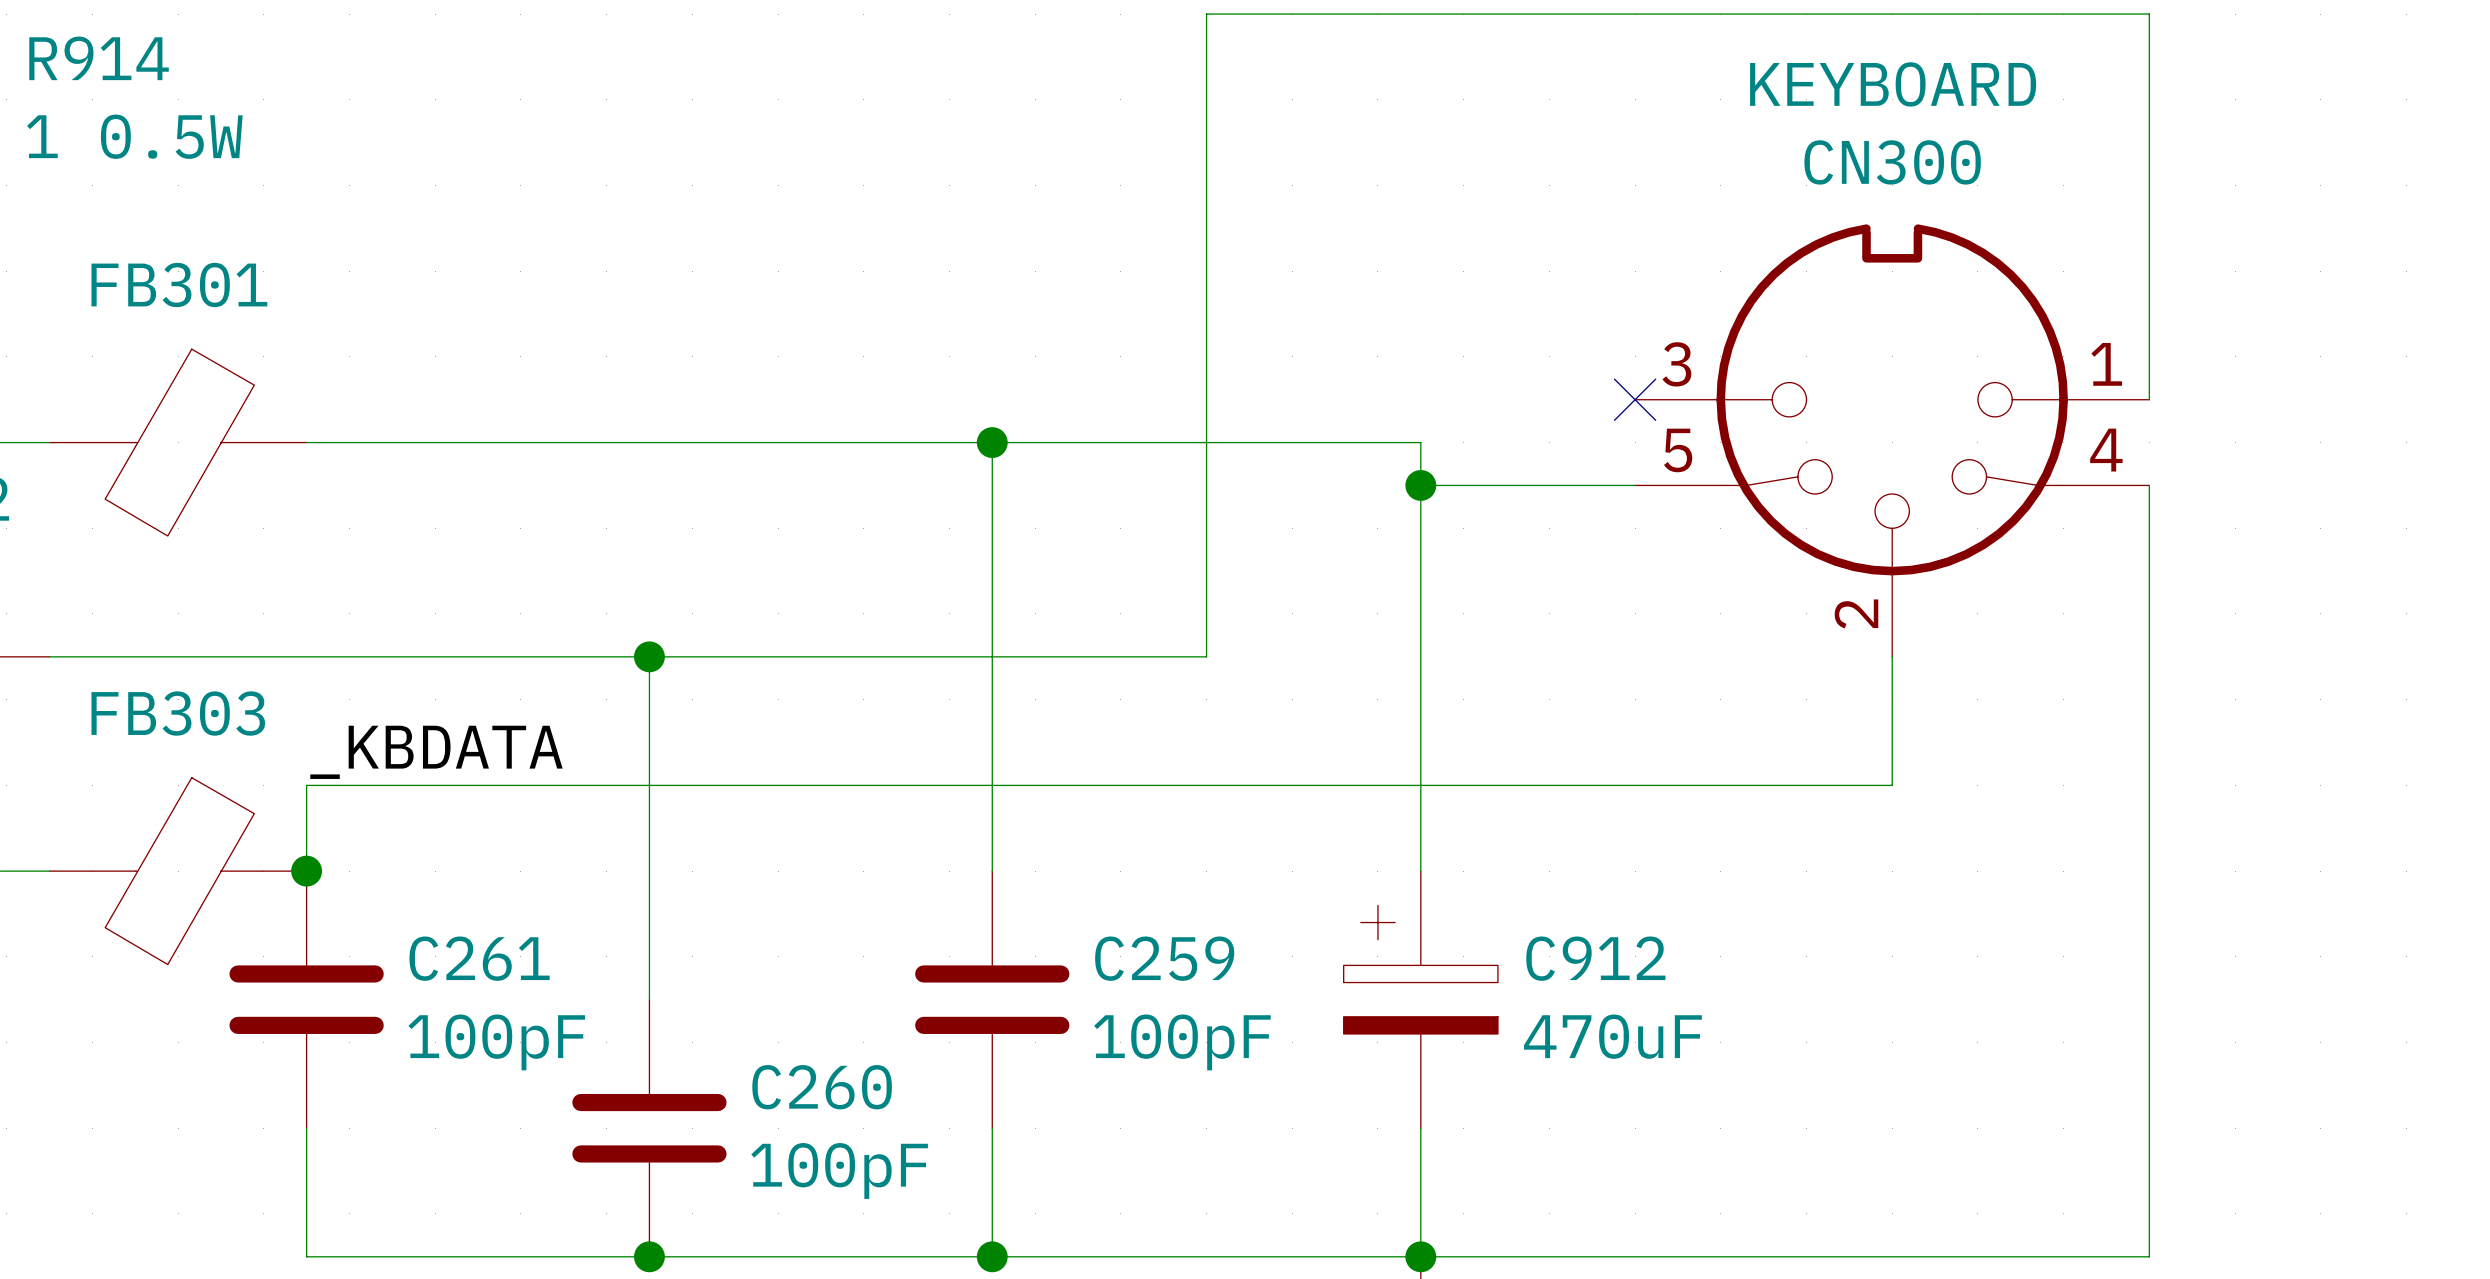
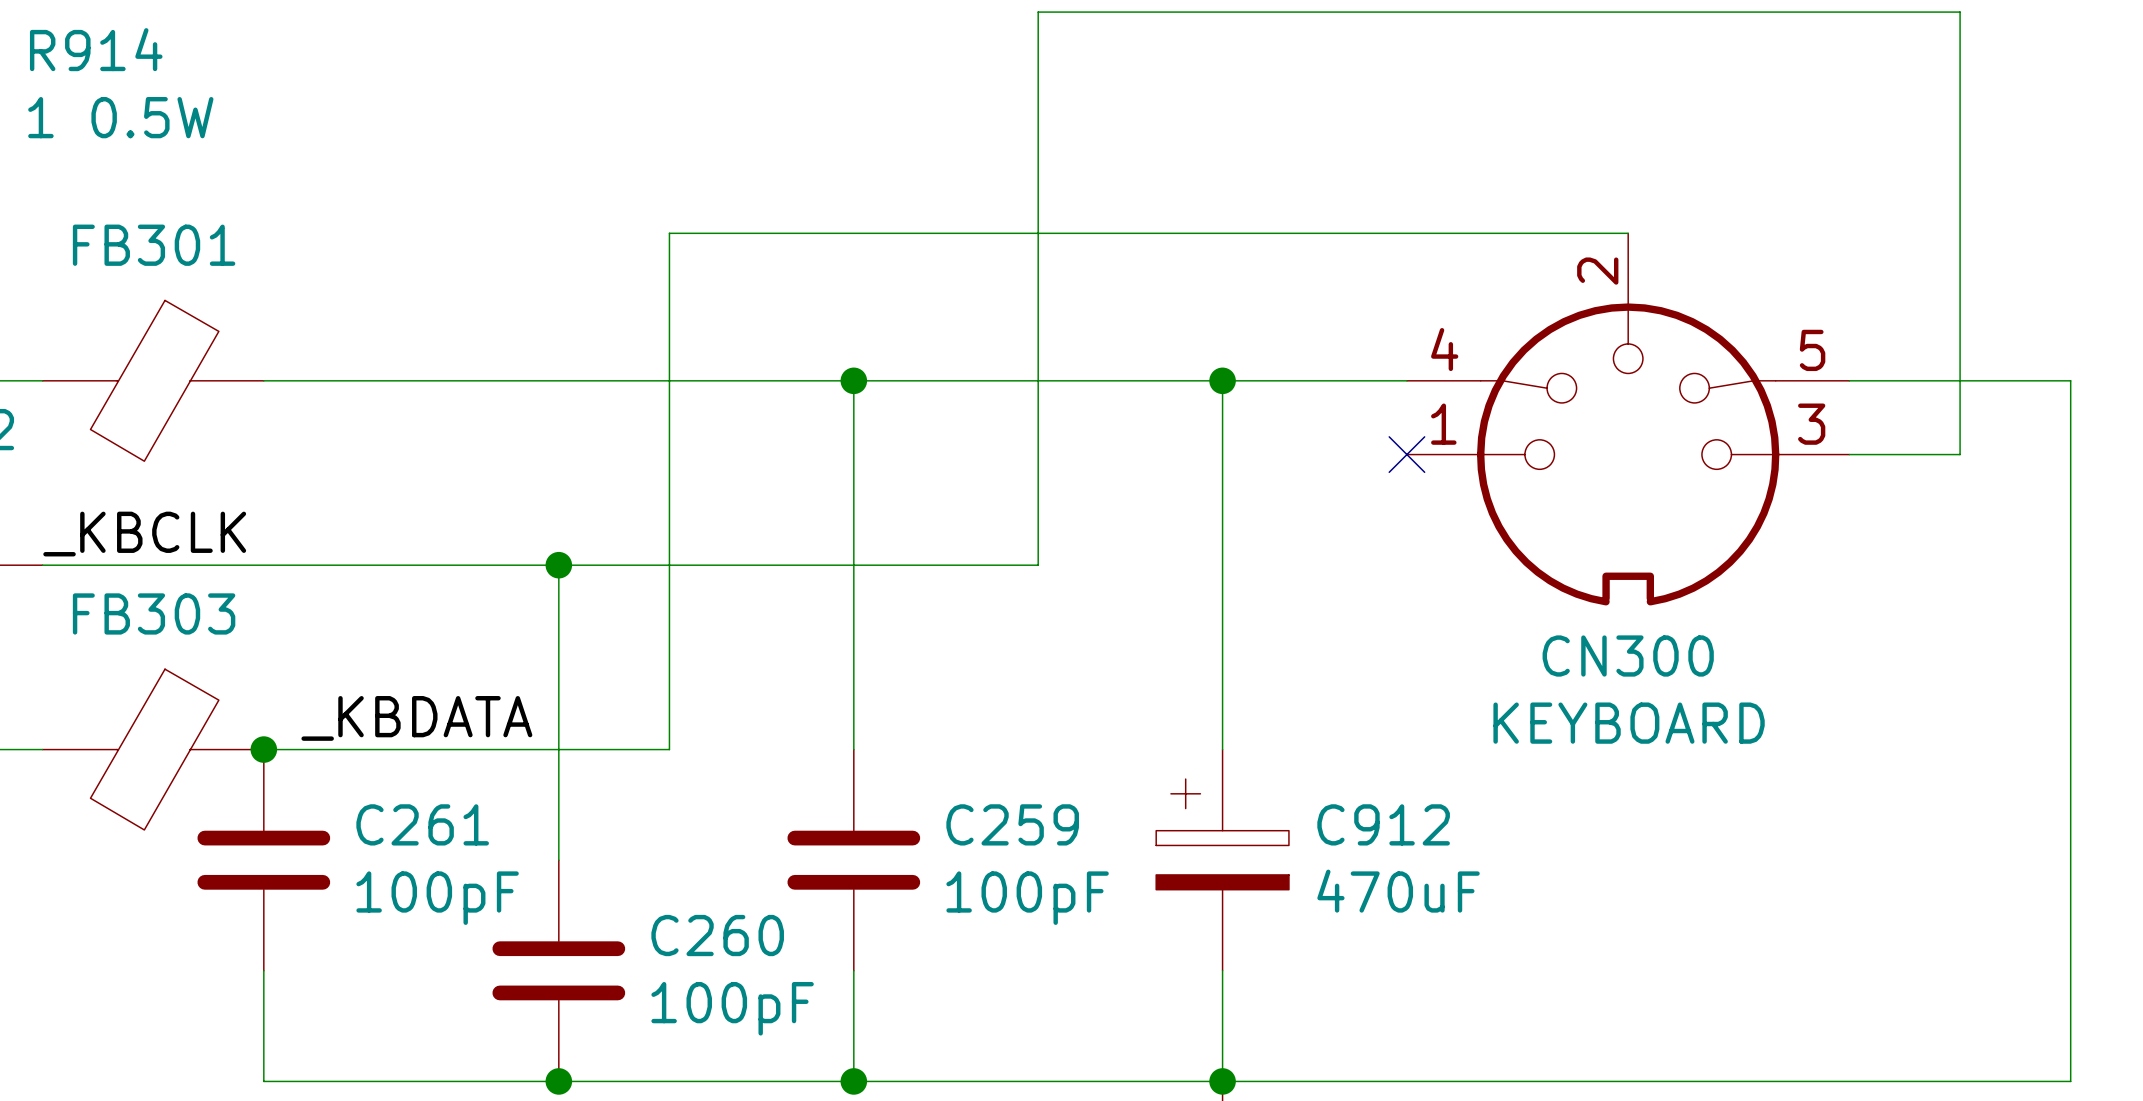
wire: (2149, 14) (2149, 399) -> (1849, 12) (1960, 12) (1960, 454) (1849, 454)
no-connect mark position: (1635, 399) -> (1406, 454)
CN300 rotation: 0° (1892, 399) -> 180° (1628, 454)
wire: (1420, 485) (1635, 485) -> (1222, 380) (1406, 380)
junction position: (1420, 485) -> (1222, 380)
wire: (2149, 485) (2149, 1256) -> (1849, 380) (2070, 380) (2070, 1081) (1849, 1081)
label: none -> _KBCLK (144, 534)
wire: (1892, 656) (1892, 785) (306, 785) (306, 871) -> (1628, 233) (669, 233) (669, 749) (263, 749)
label position: _KBDATA (436, 752) -> _KBDATA (416, 718)

